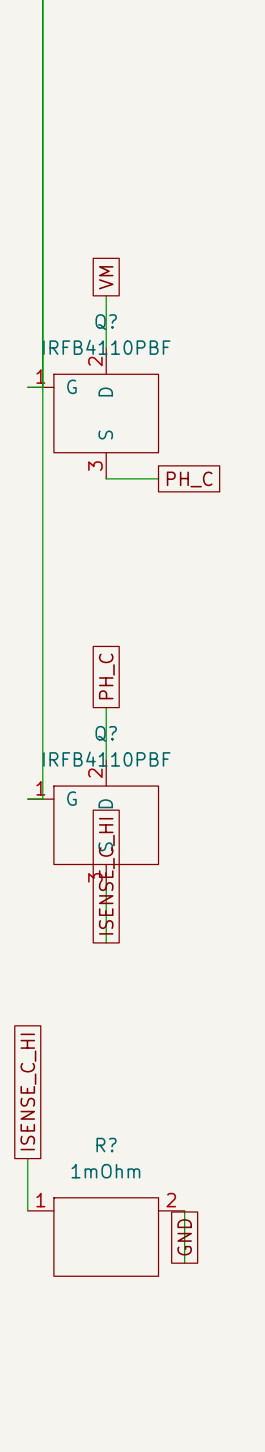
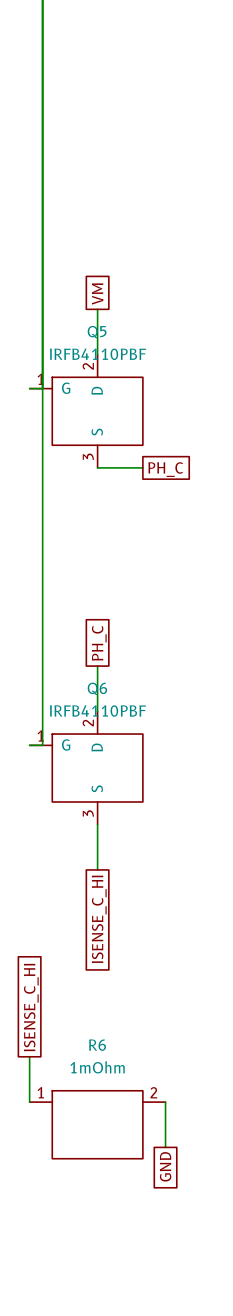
Q? name: Q? (106, 322) -> Q5 (97, 332)
Q? name: Q? (106, 733) -> Q6 (97, 688)
global label rotation: 0° (106, 876) -> 180° (99, 919)
R? name: R? (106, 1145) -> R6 (97, 1045)
global label rotation: 0° (184, 1237) -> 180° (165, 1166)
global label position: GND (184, 1237) -> GND (165, 1166)

